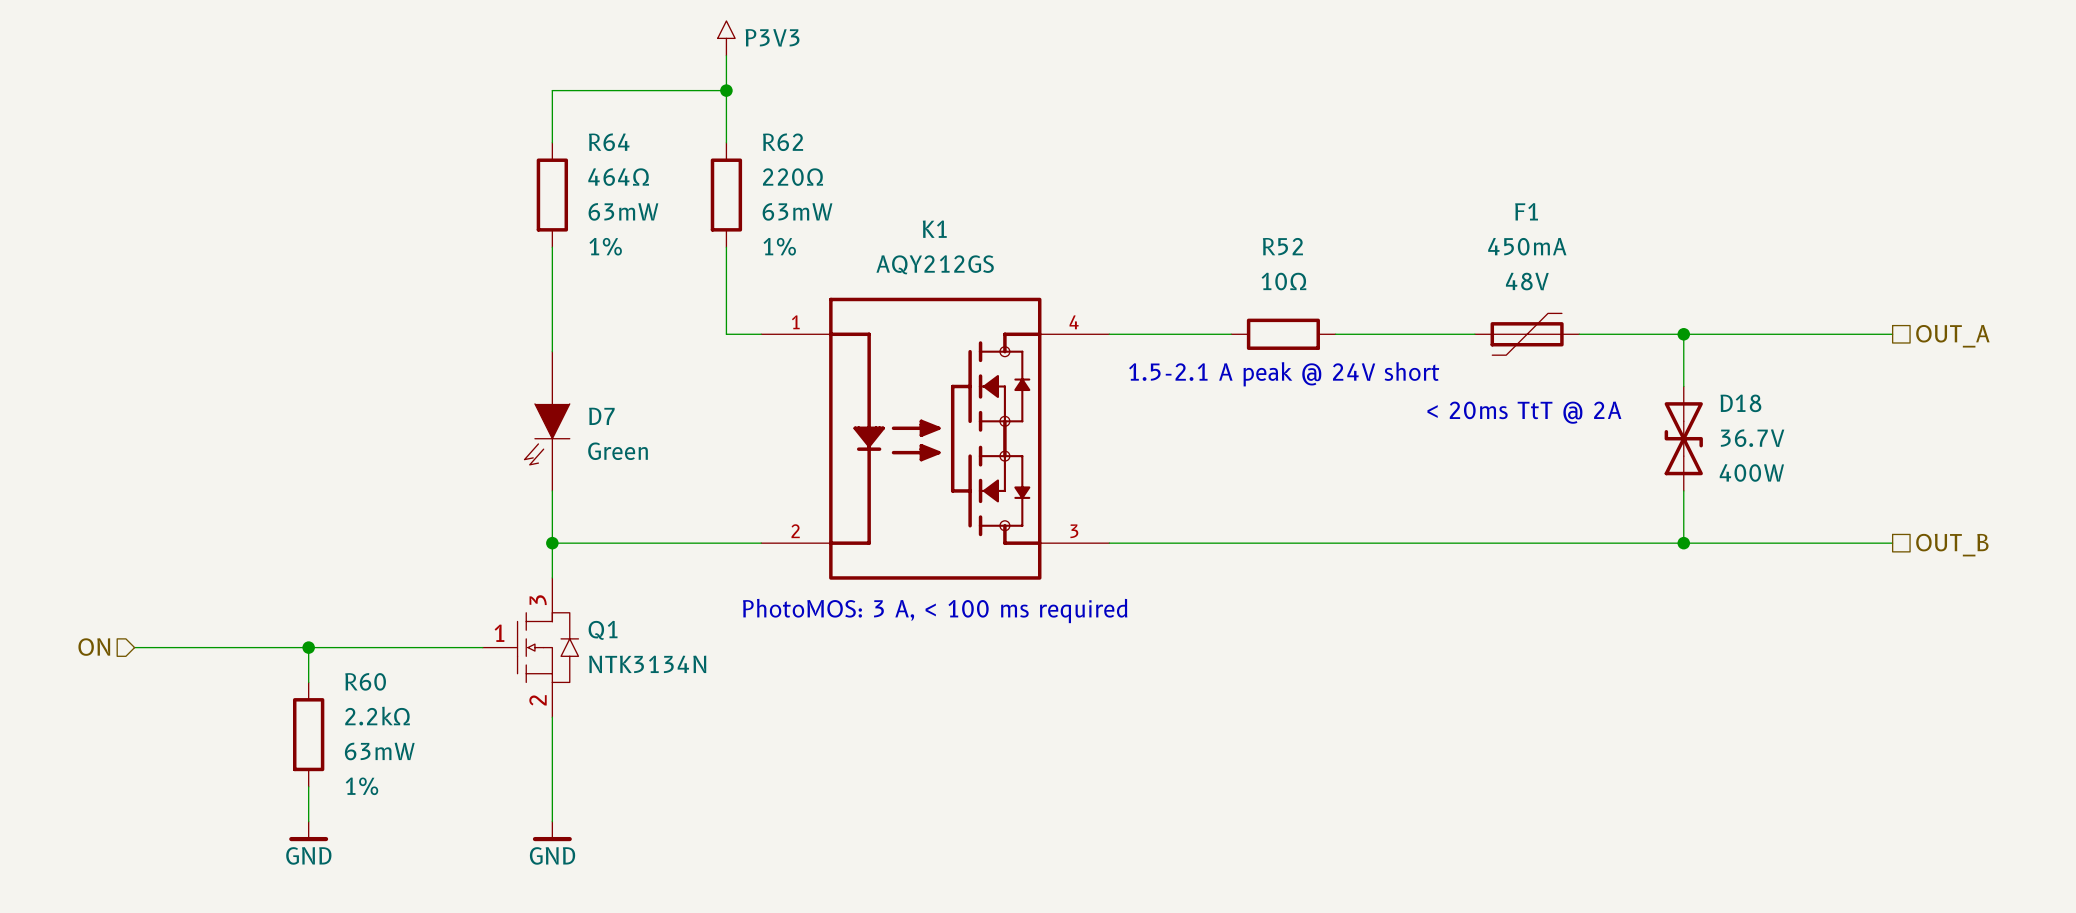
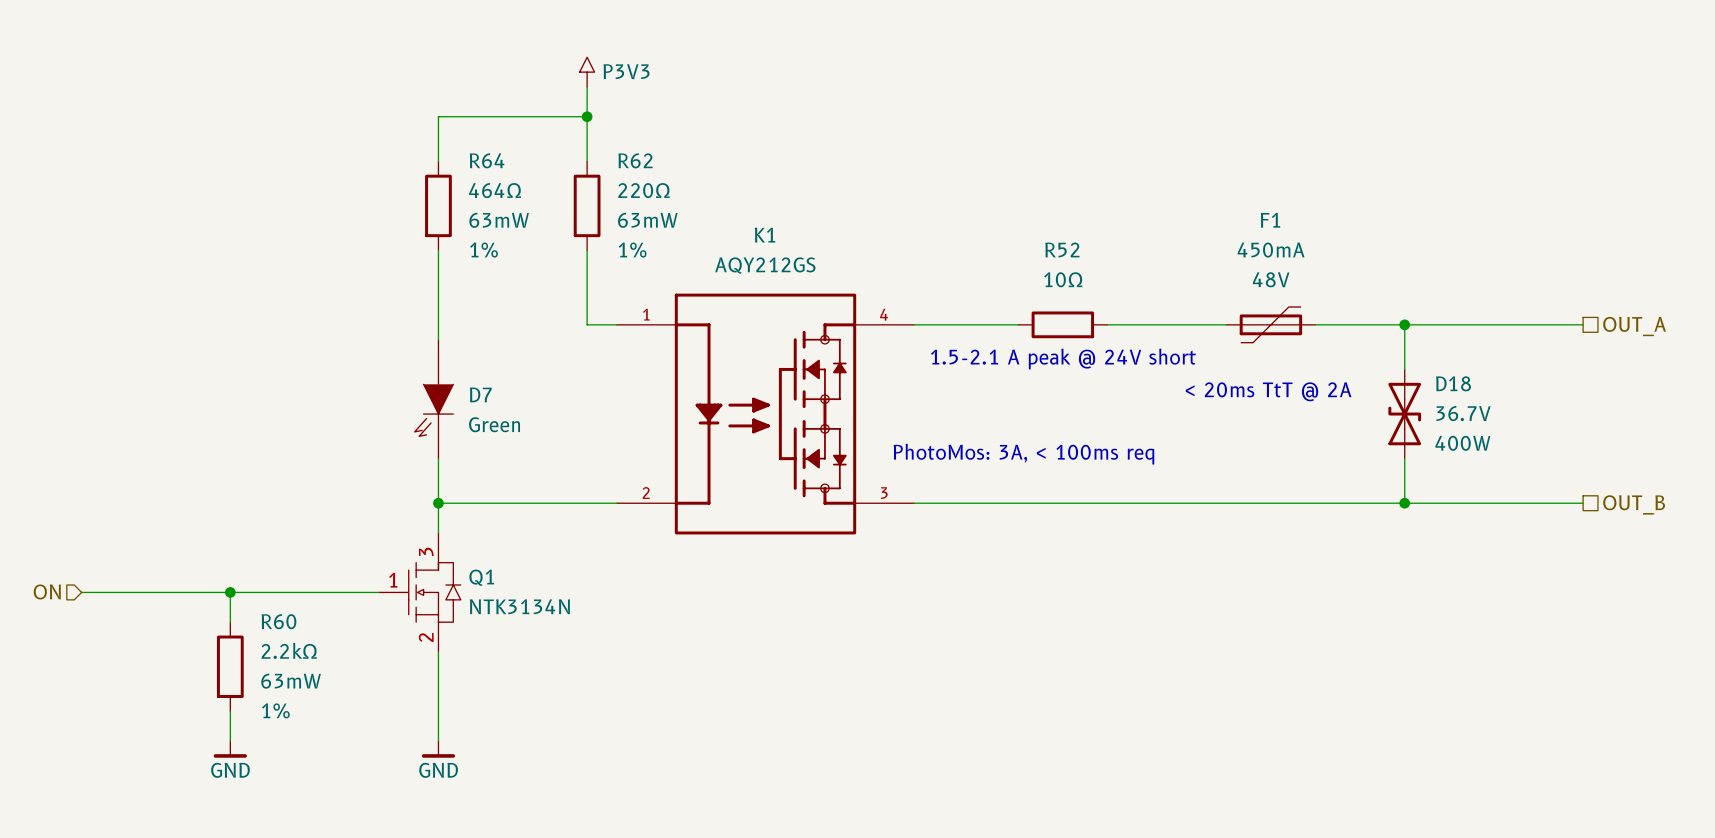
text: none -> PhotoMos: 3A, < 100ms req (1023, 454)
text: PhotoMOS: 3 A, < 100 ms required (935, 611) -> none

